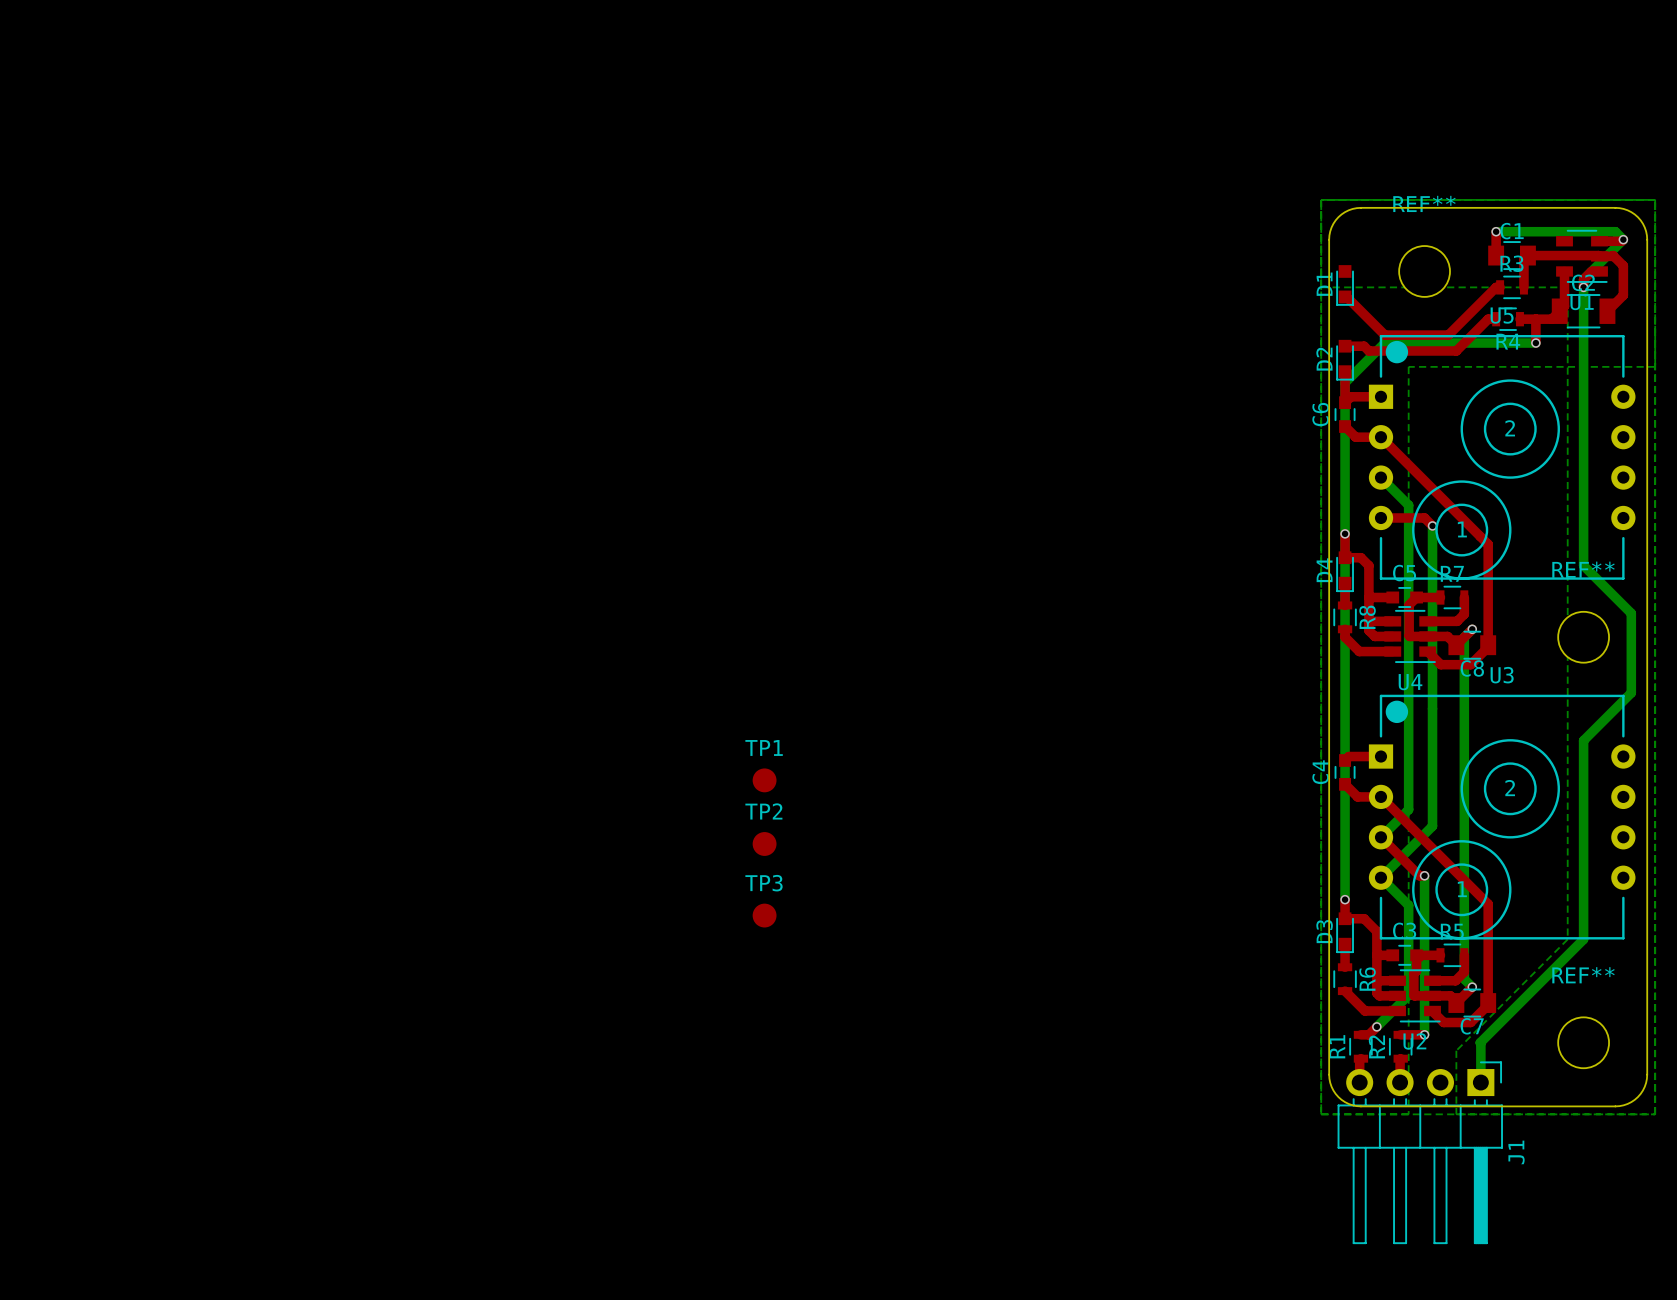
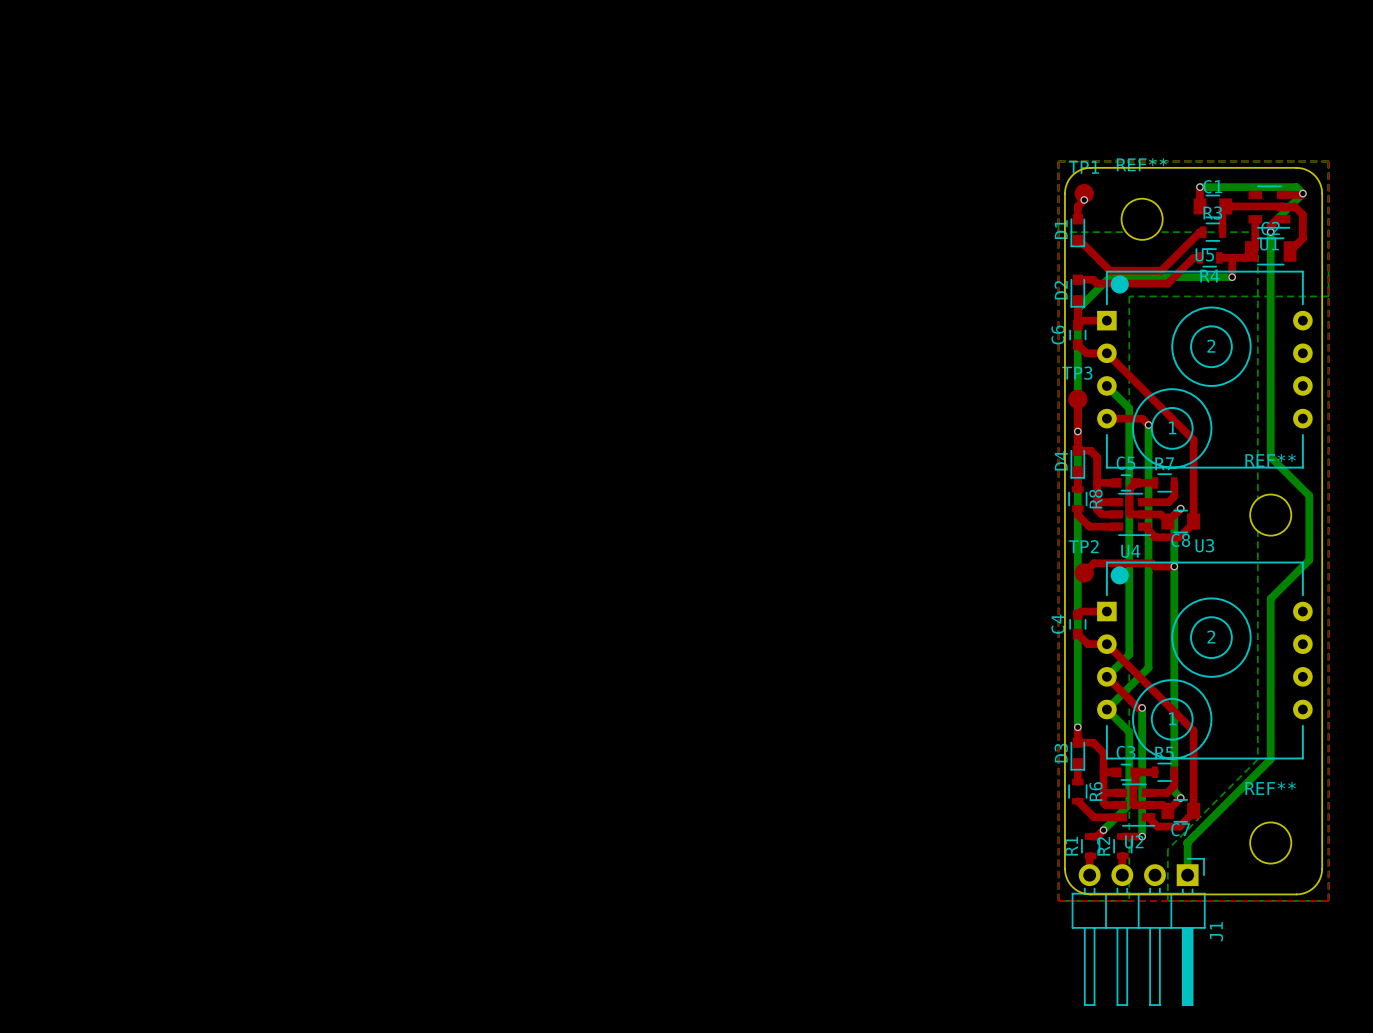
top zone outline: none -> (1058, 161) (1328, 161) (1328, 900) (1058, 900) (1058, 161)
top track: none -> (1084, 200) (1077, 206) (1077, 219)
via: none -> (1084, 200)
top track: none -> (1077, 399) (1077, 431)
top track: none -> (1174, 566) (1154, 566) (1151, 563) (1093, 563) (1084, 572)
via: none -> (1174, 566)
TP1 position: (764, 780) -> (1084, 193)
TP2 position: (764, 843) -> (1084, 572)
TP3 position: (764, 915) -> (1077, 399)

